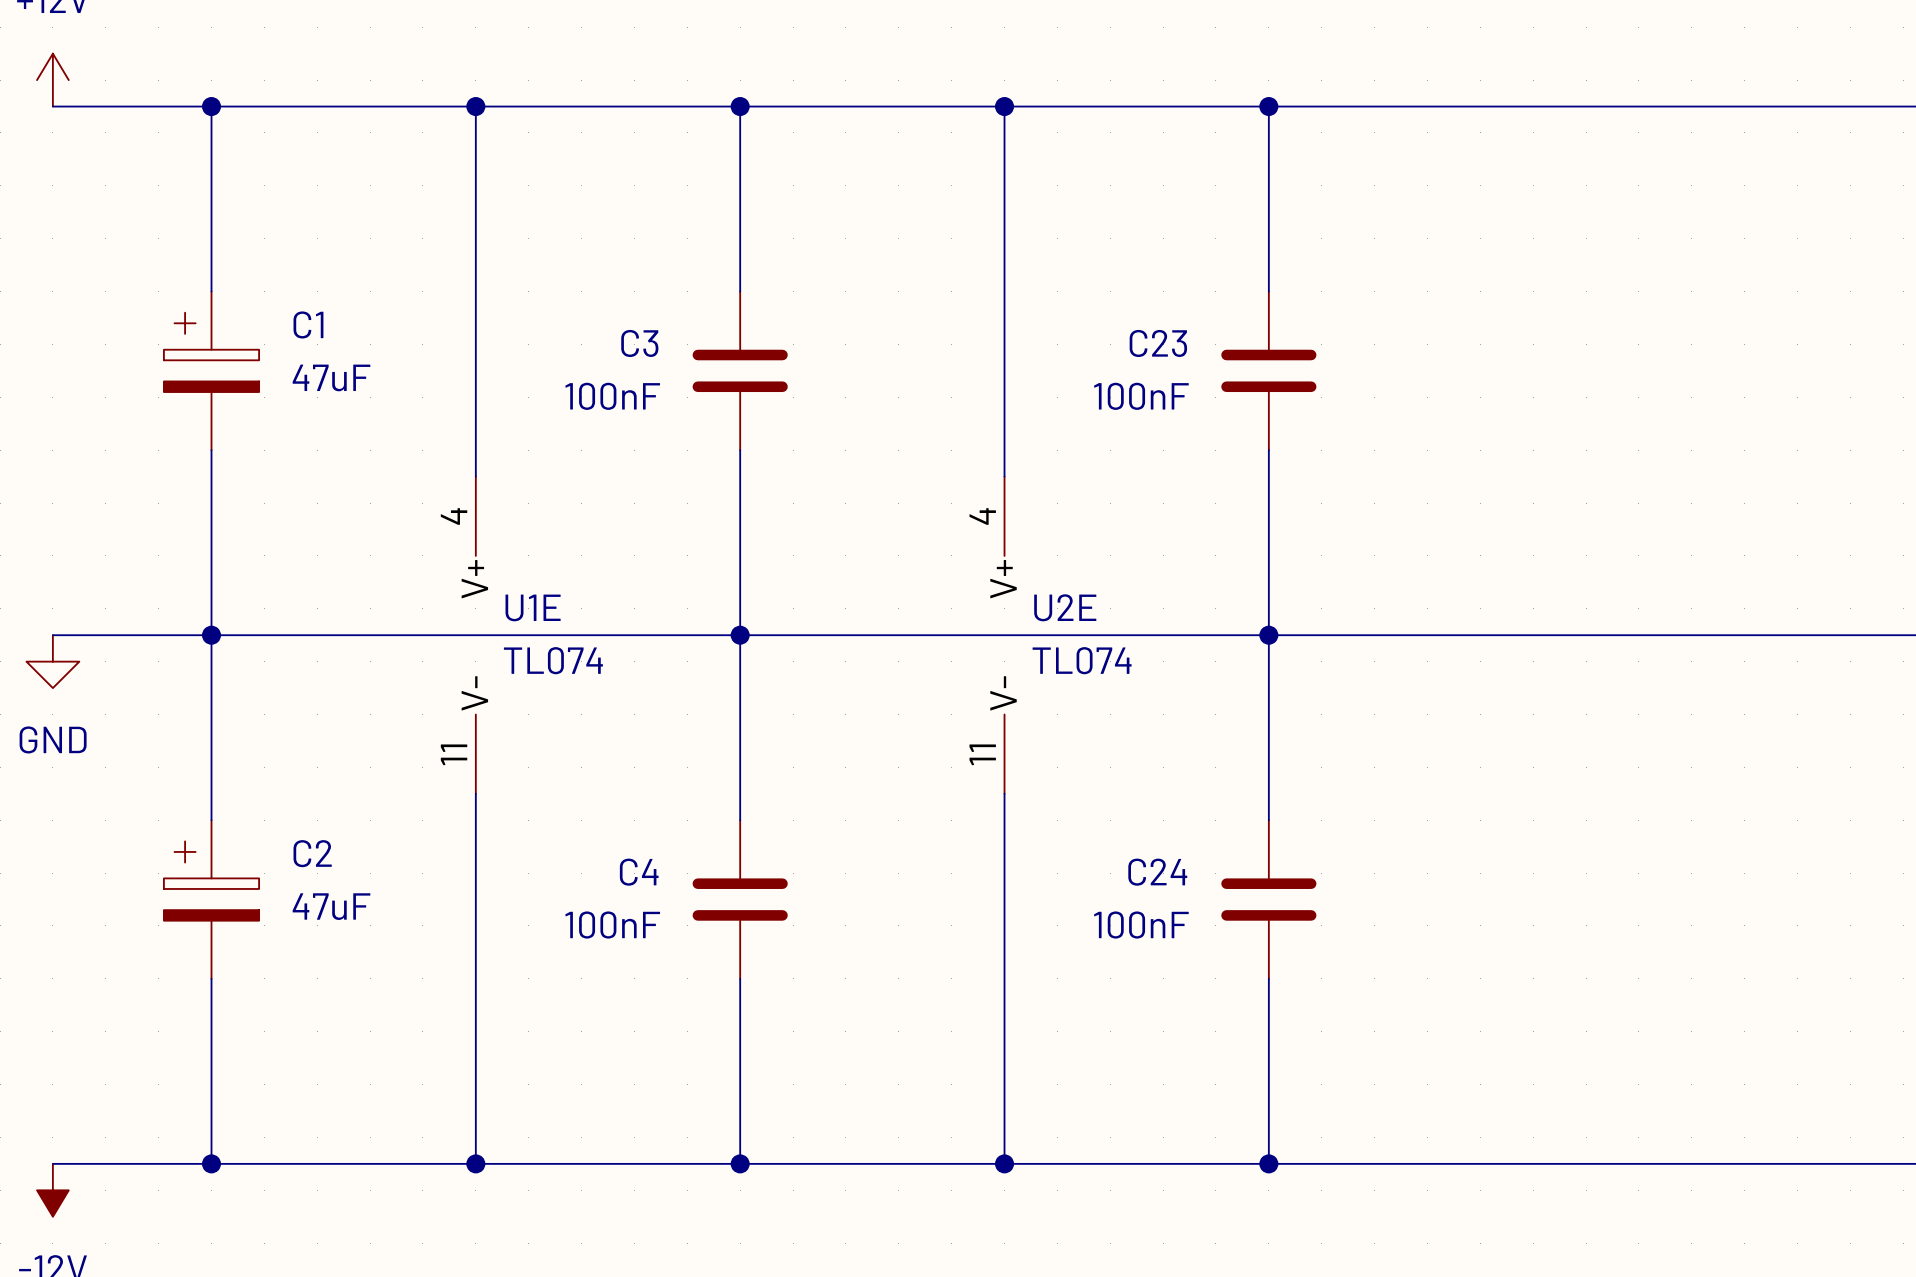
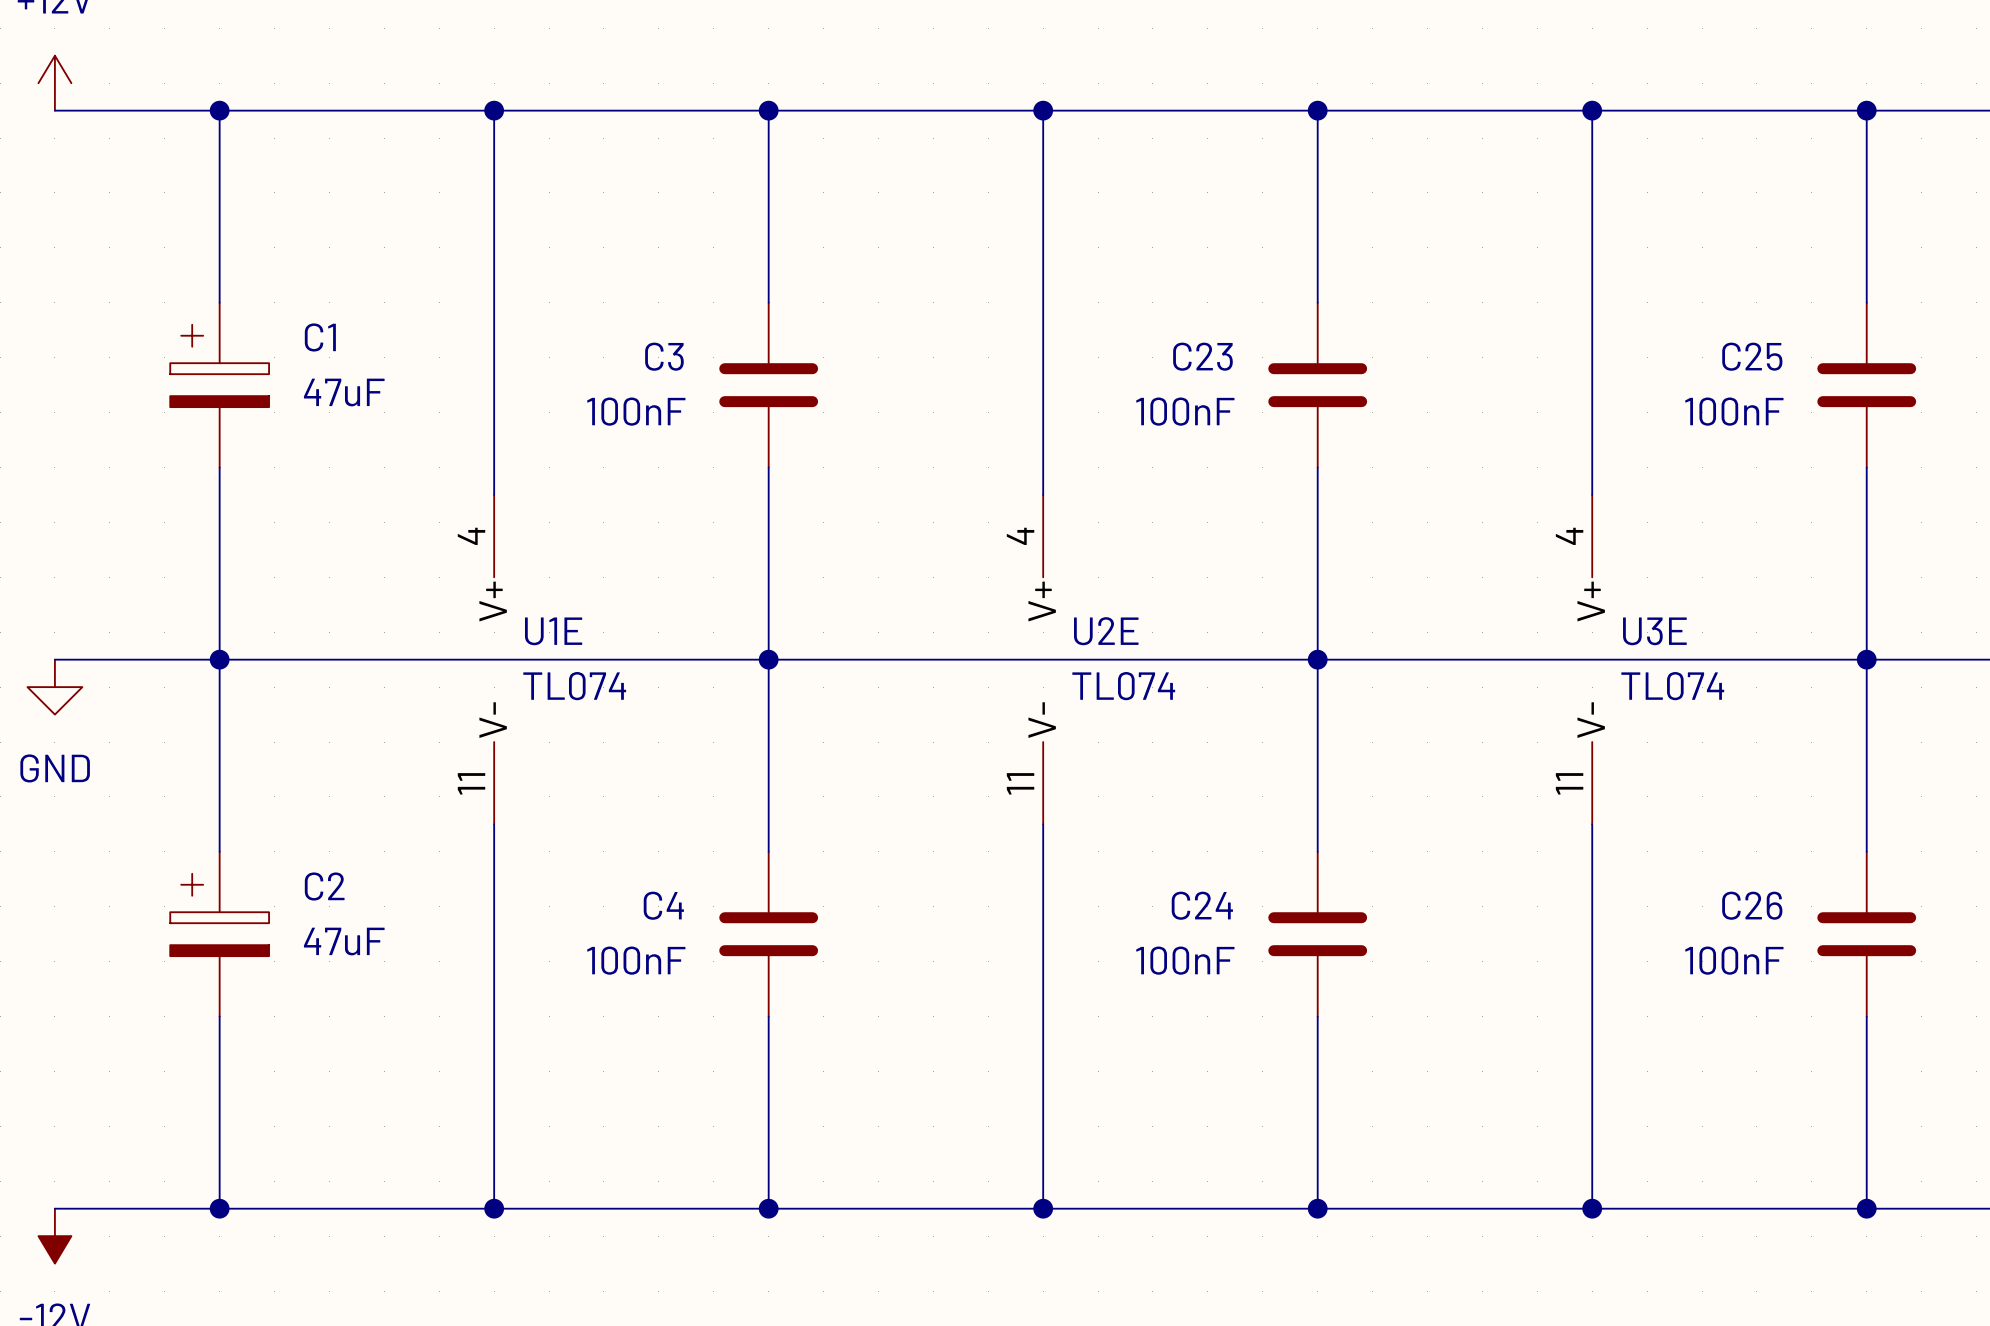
wire: none -> (1592, 110) (1592, 494)
junction: none -> (1592, 110)
wire: none -> (1866, 110) (1866, 302)
junction: none -> (1866, 110)
C25: none -> 100nF (1866, 385)
wire: none -> (1866, 467) (1866, 851)
U3E: none -> TL074 (1592, 659)
junction: none -> (1866, 659)
wire: none -> (1592, 824) (1592, 1208)
C26: none -> 100nF (1866, 934)
wire: none -> (1866, 1016) (1866, 1208)
junction: none -> (1592, 1208)
junction: none -> (1866, 1208)

